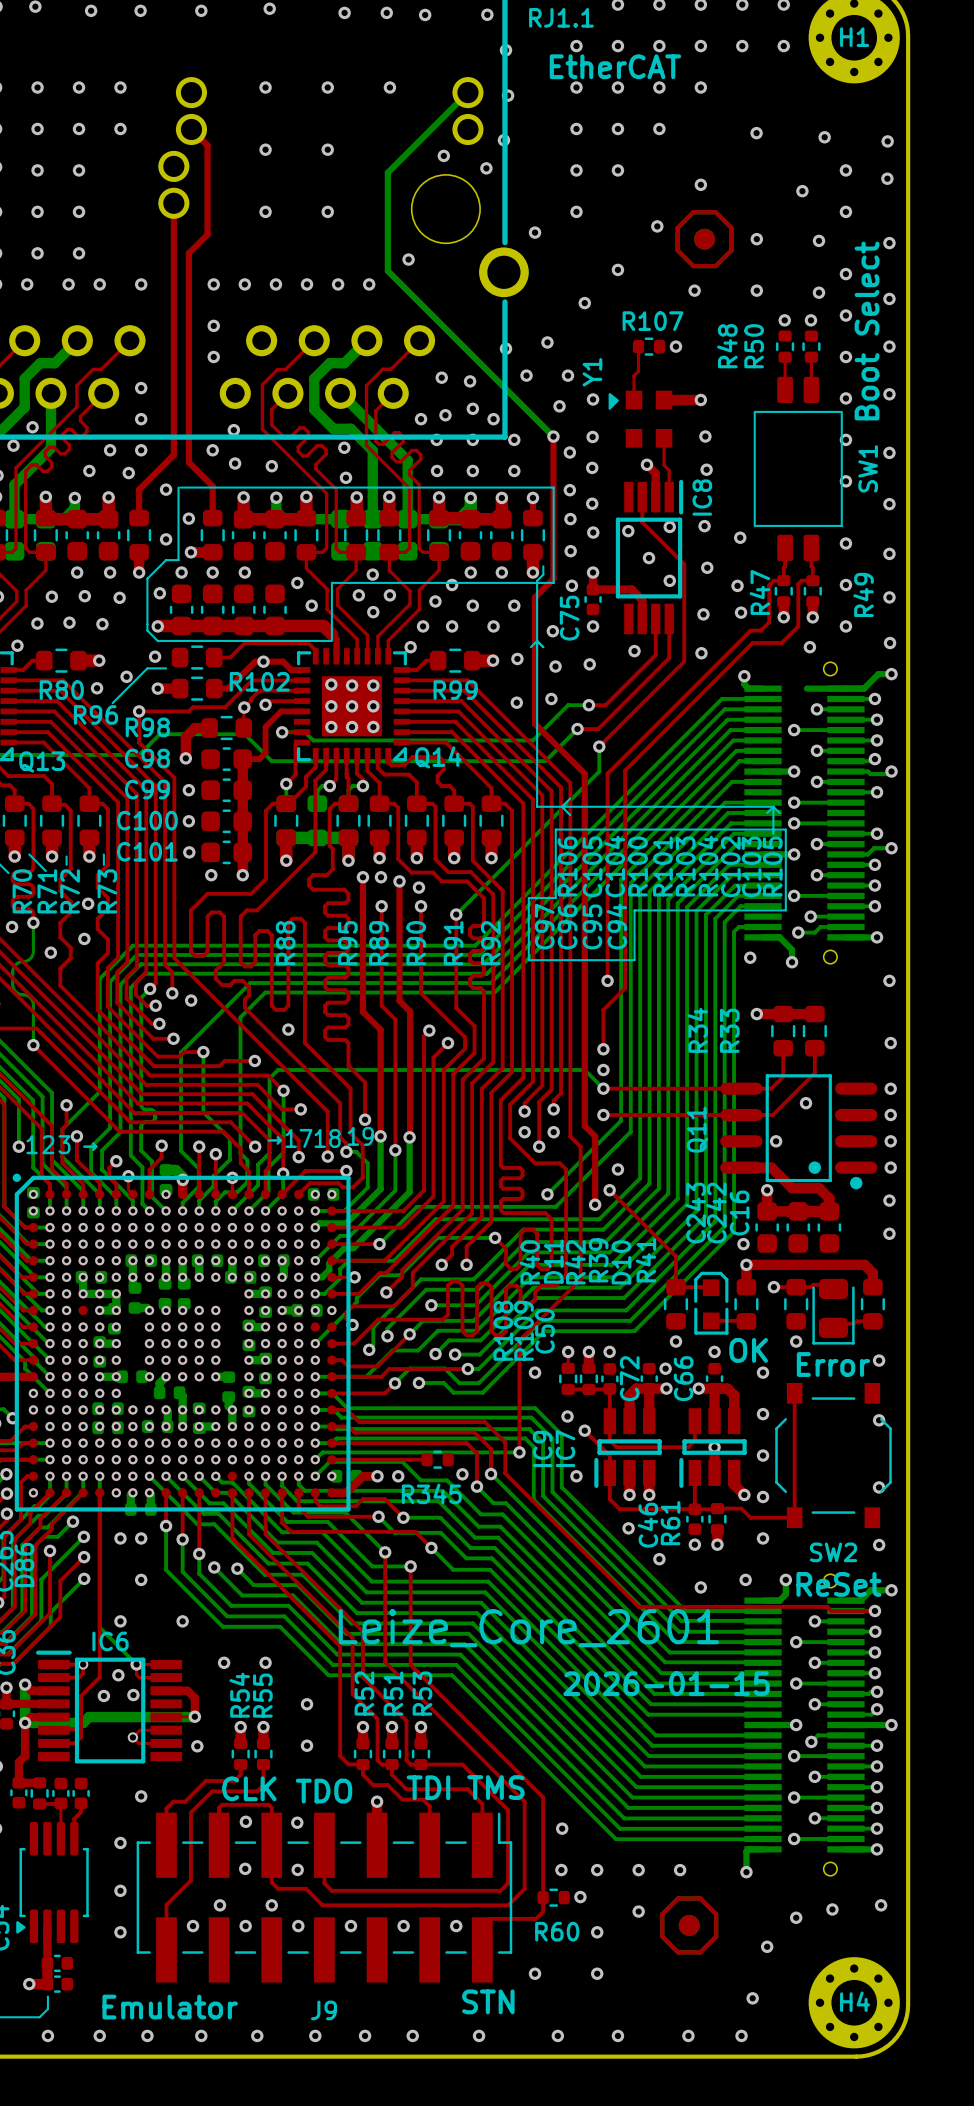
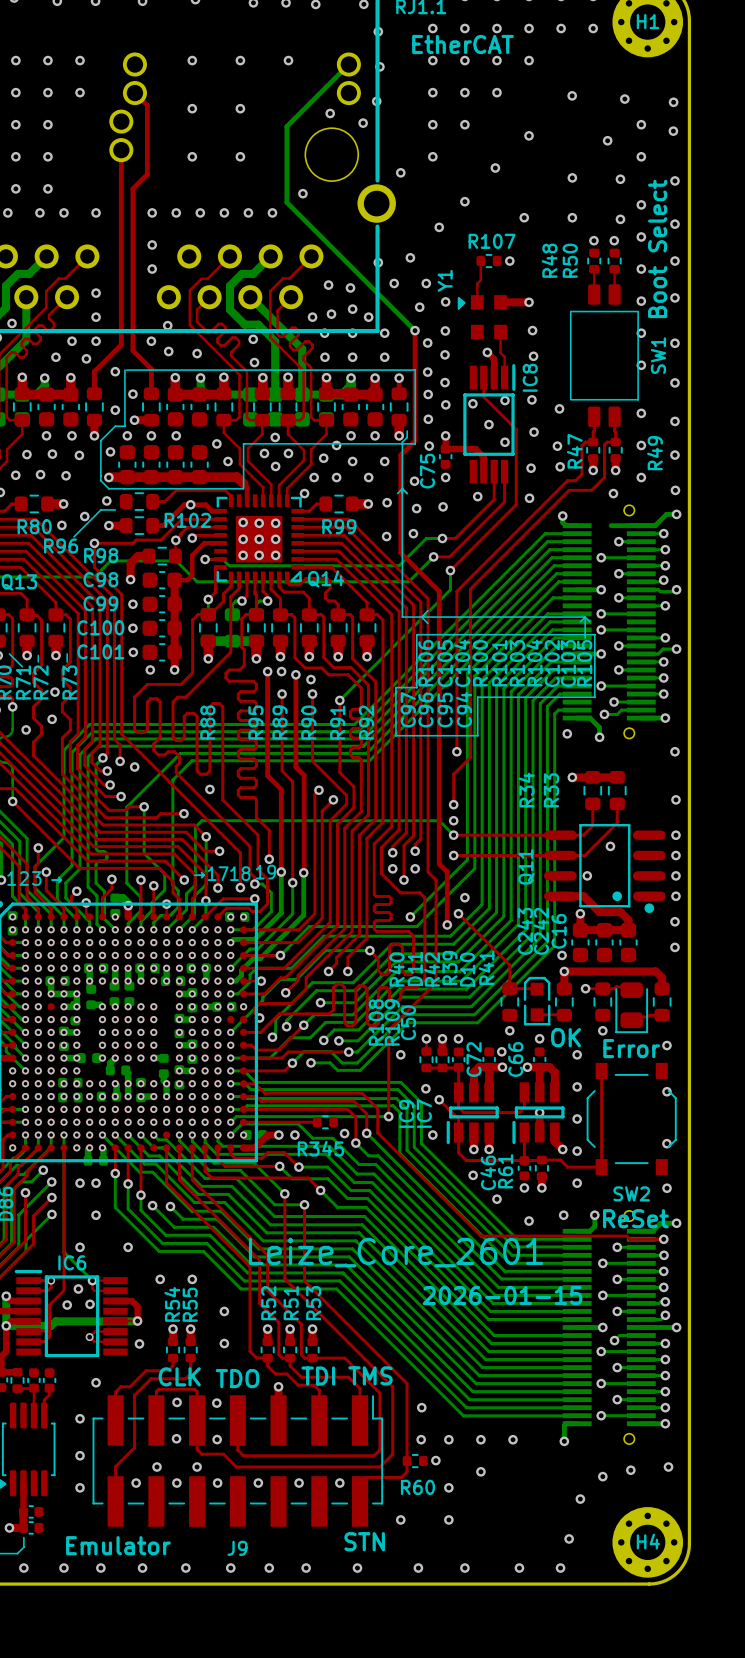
part: (704, 239) -> none
part: (689, 1925) -> none

